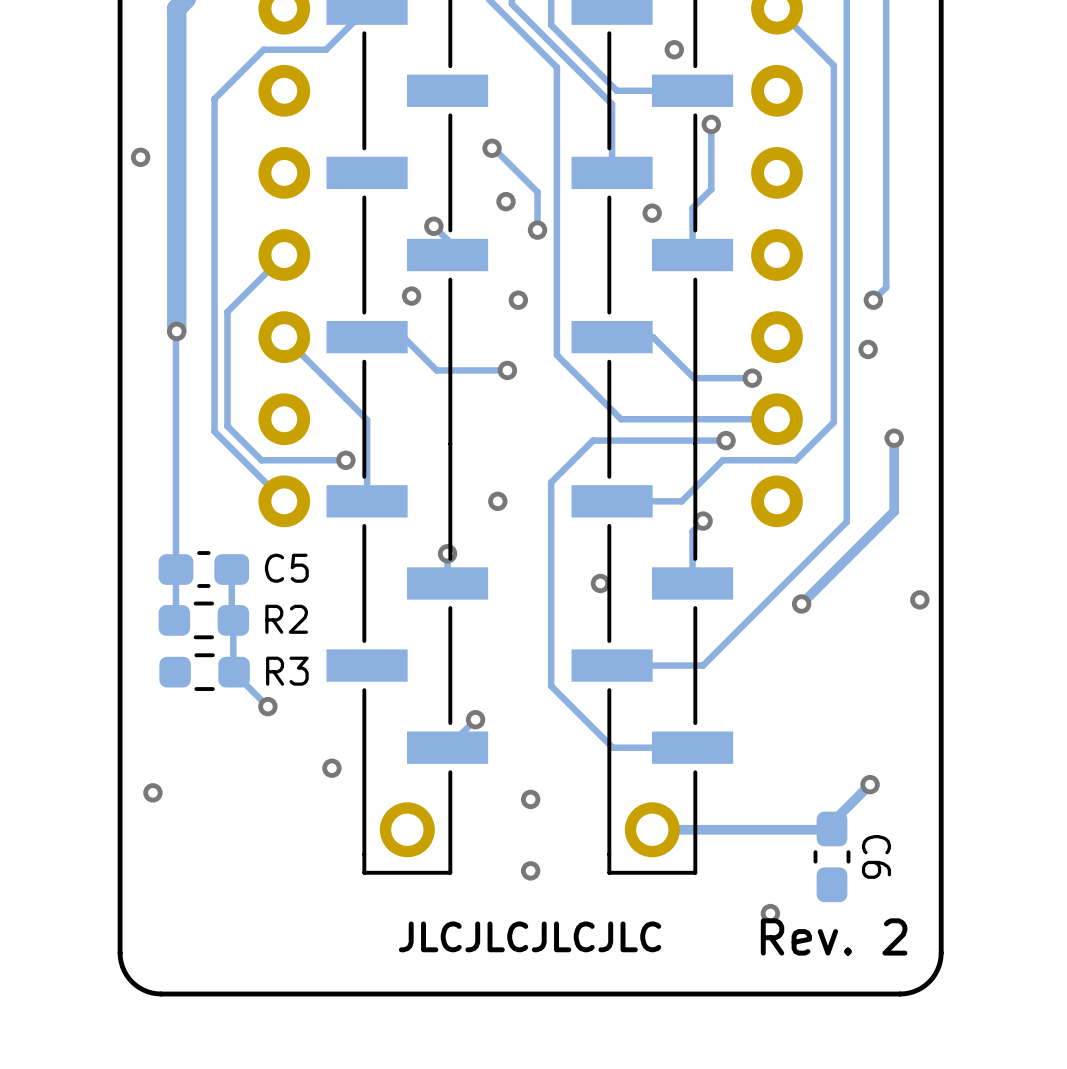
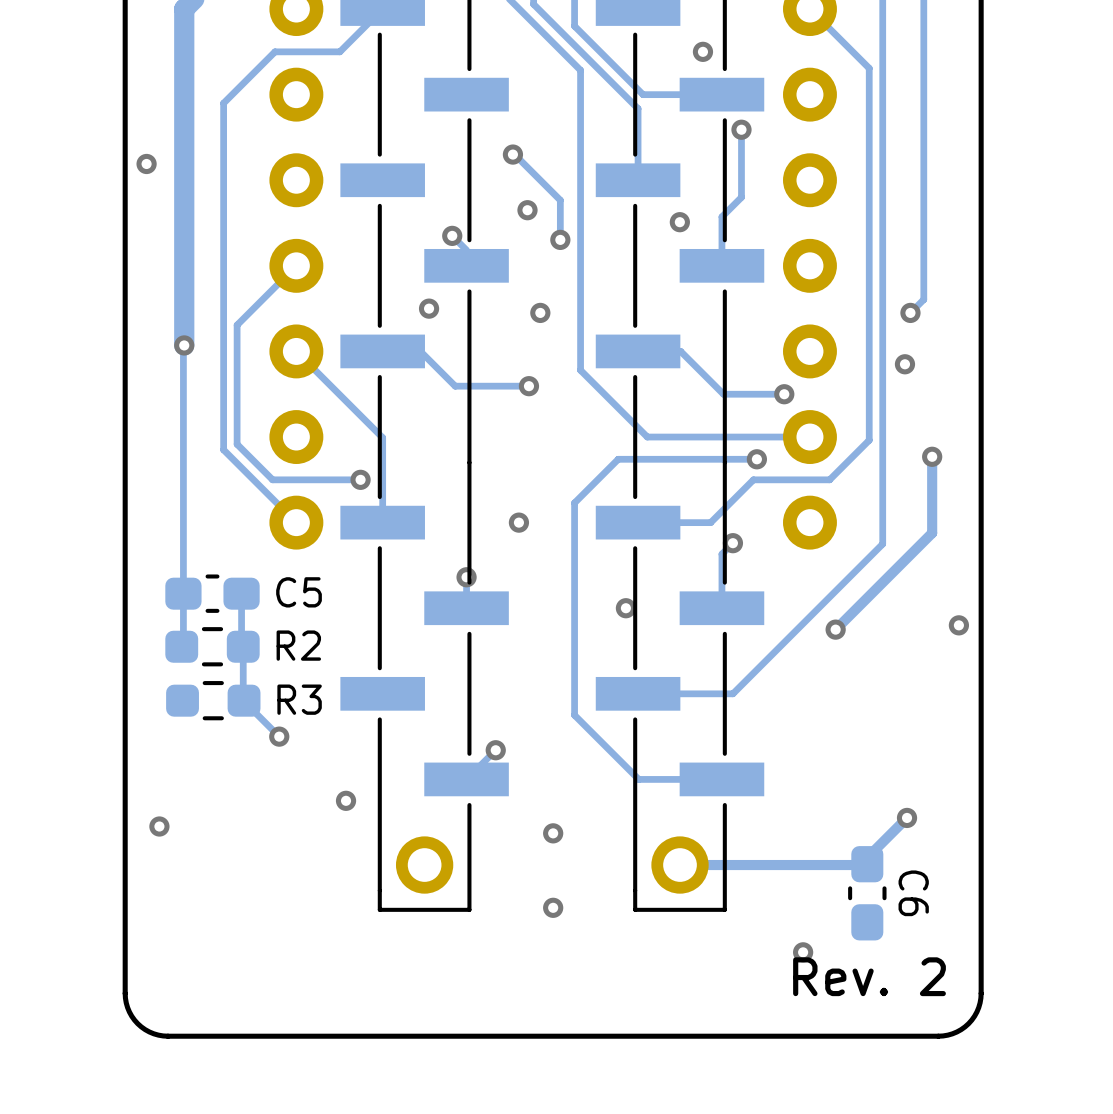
text: JLCJLCJLCJLC (530, 936) -> none

